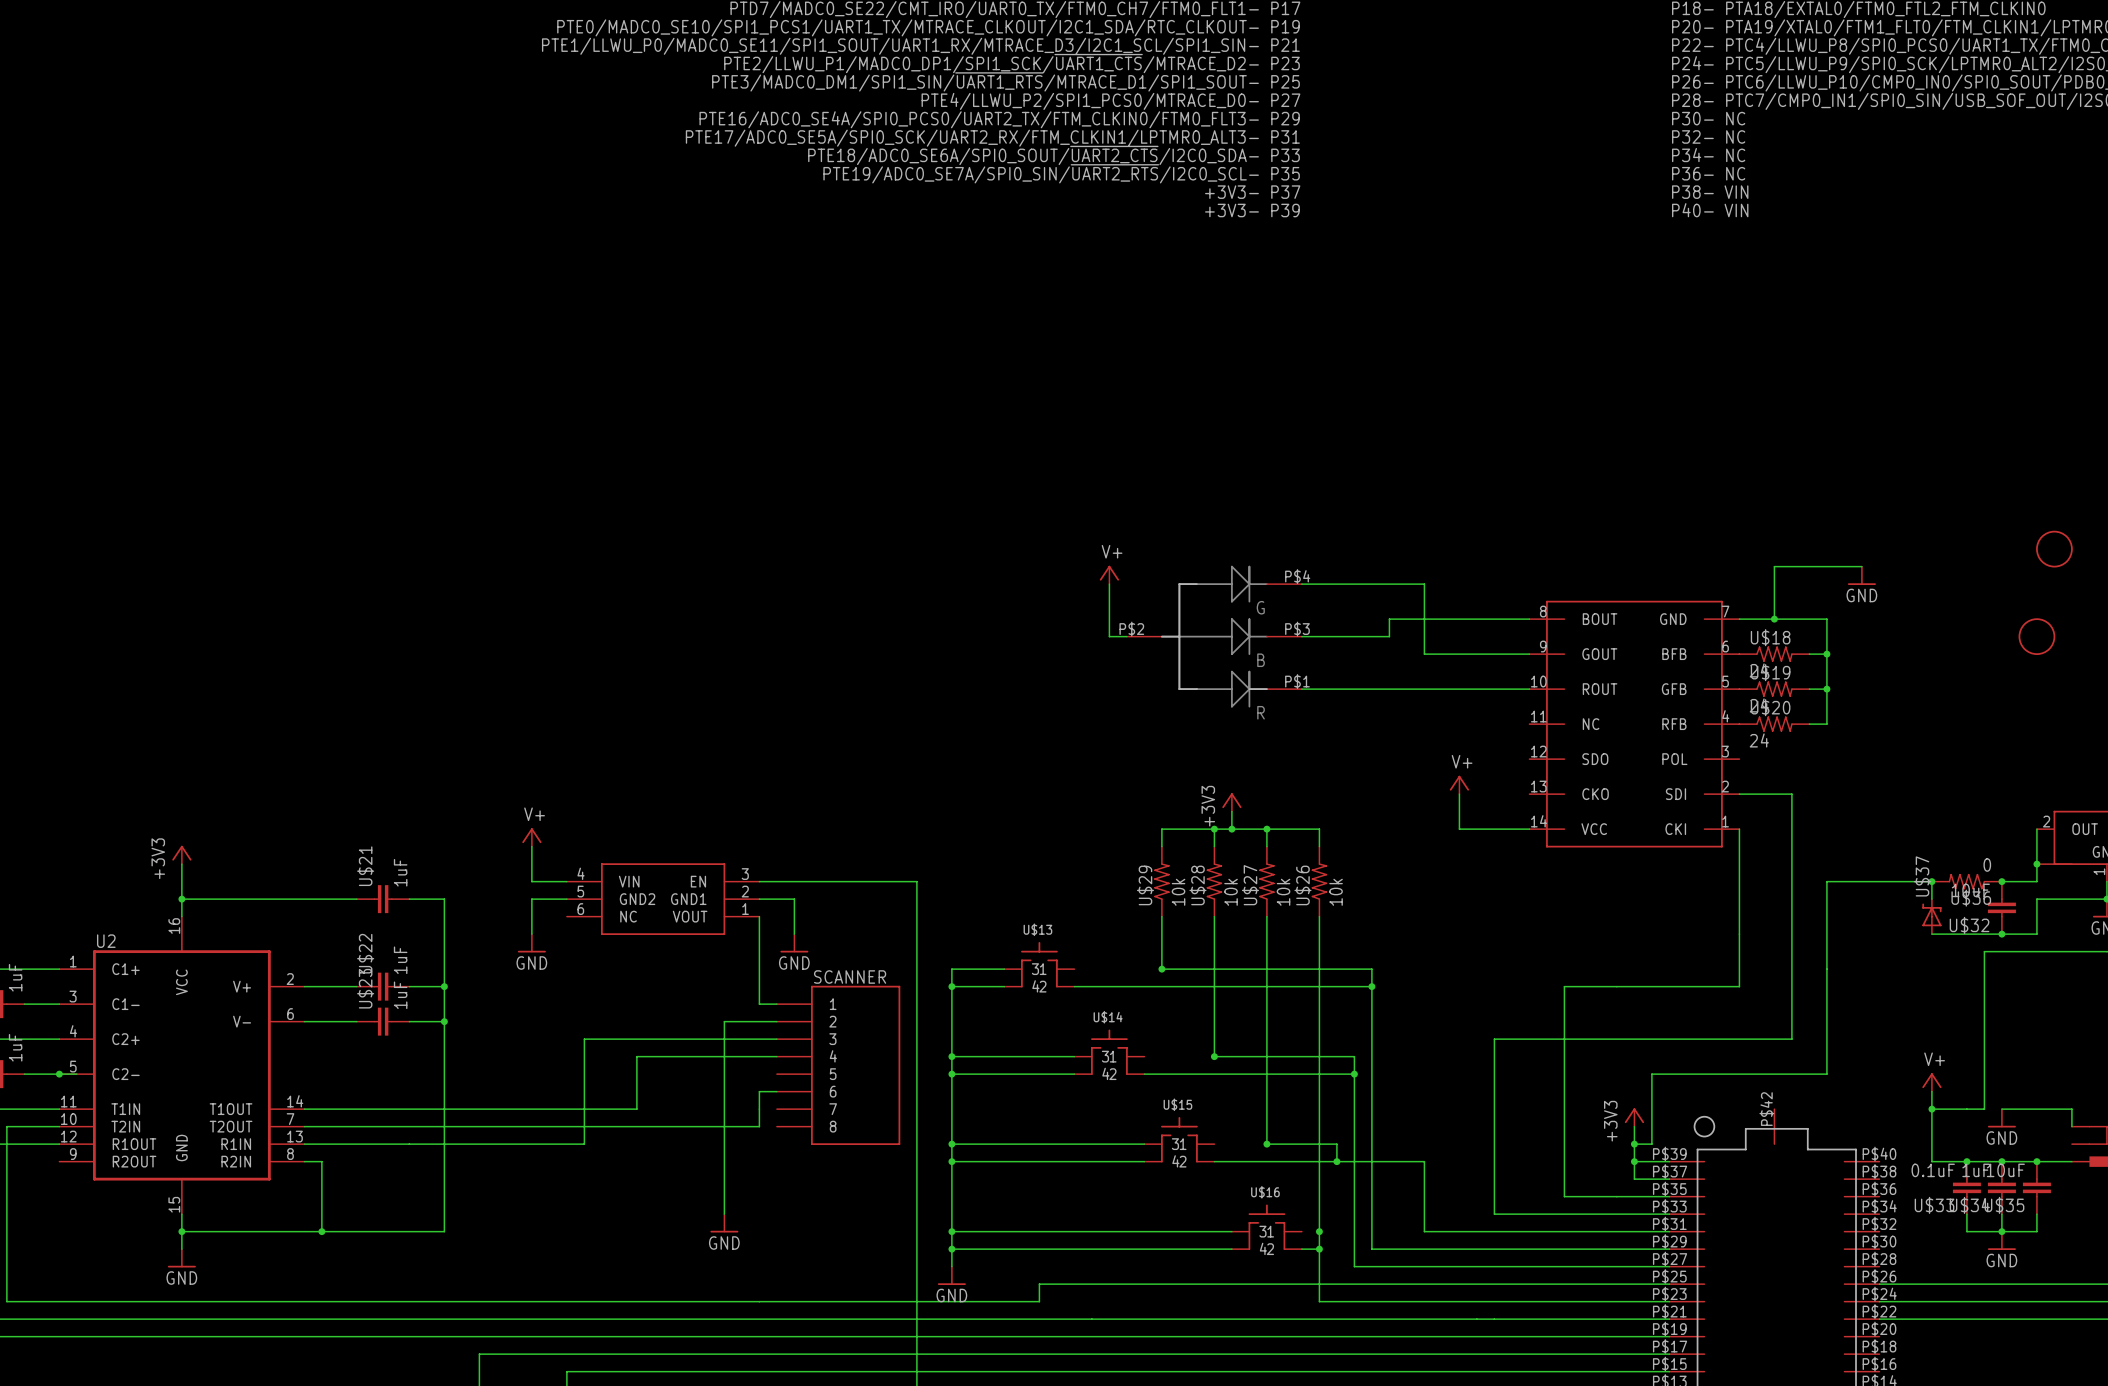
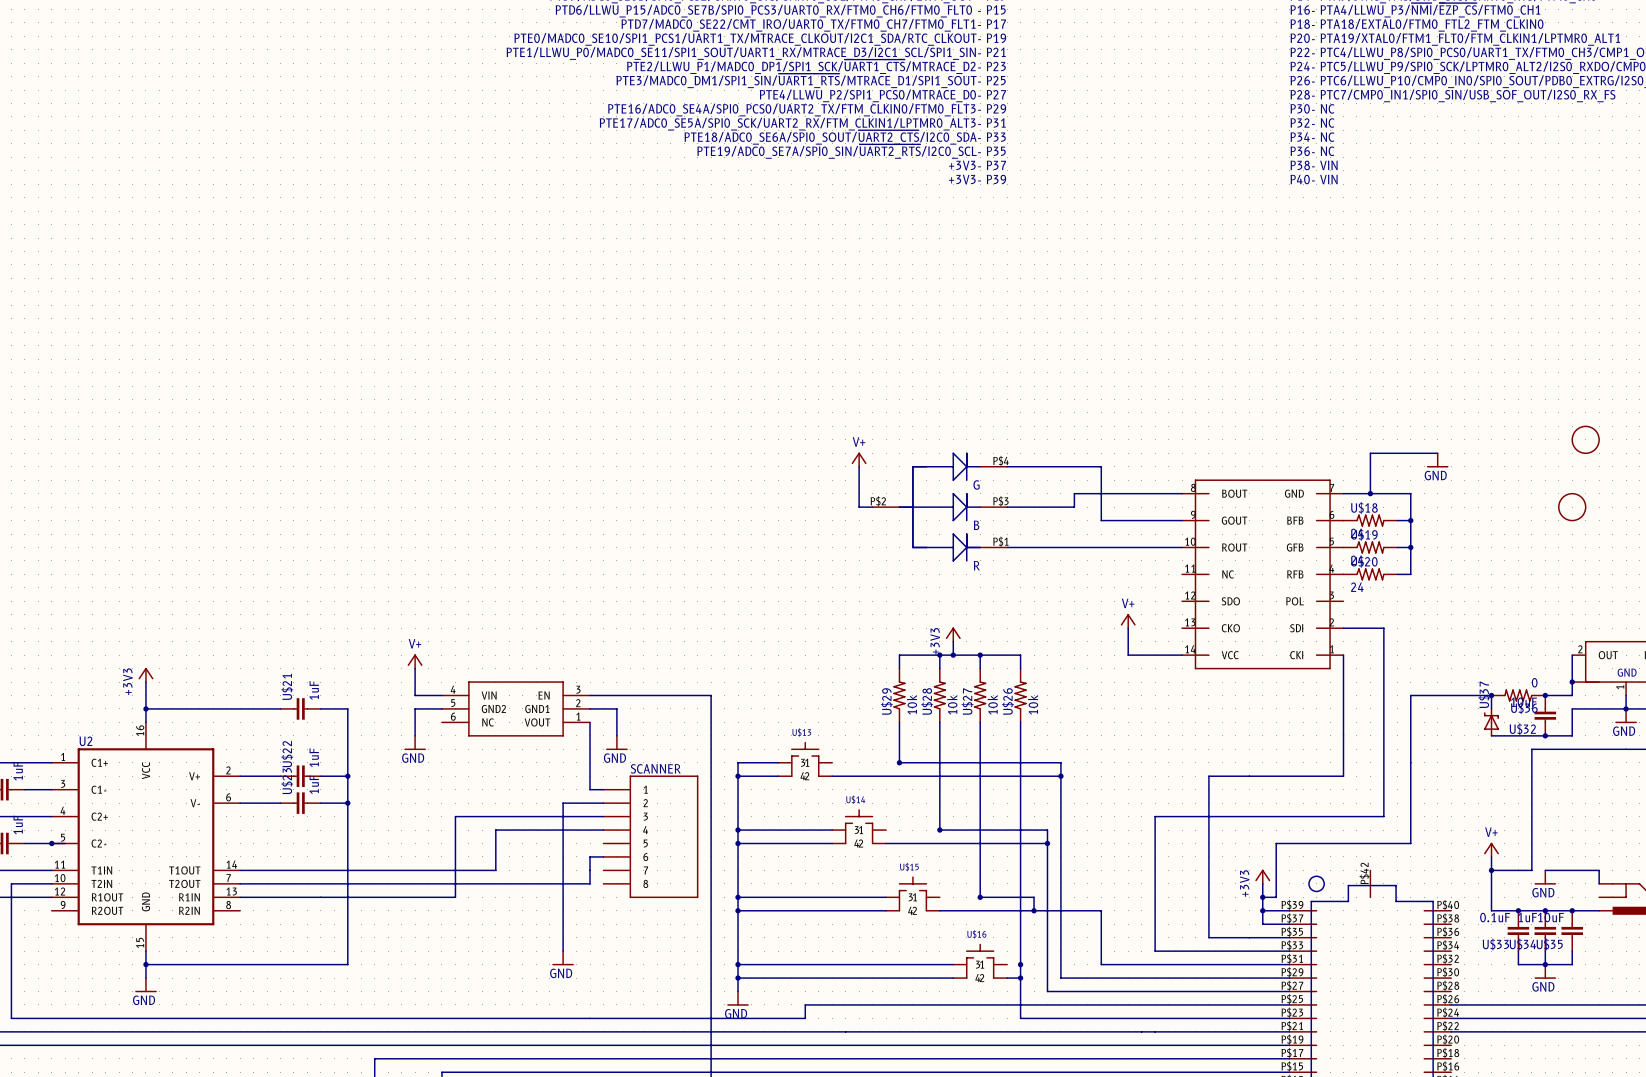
wire: (304, 1161) (321, 1161) (321, 1231) -> none
junction: (321, 1231) -> none

